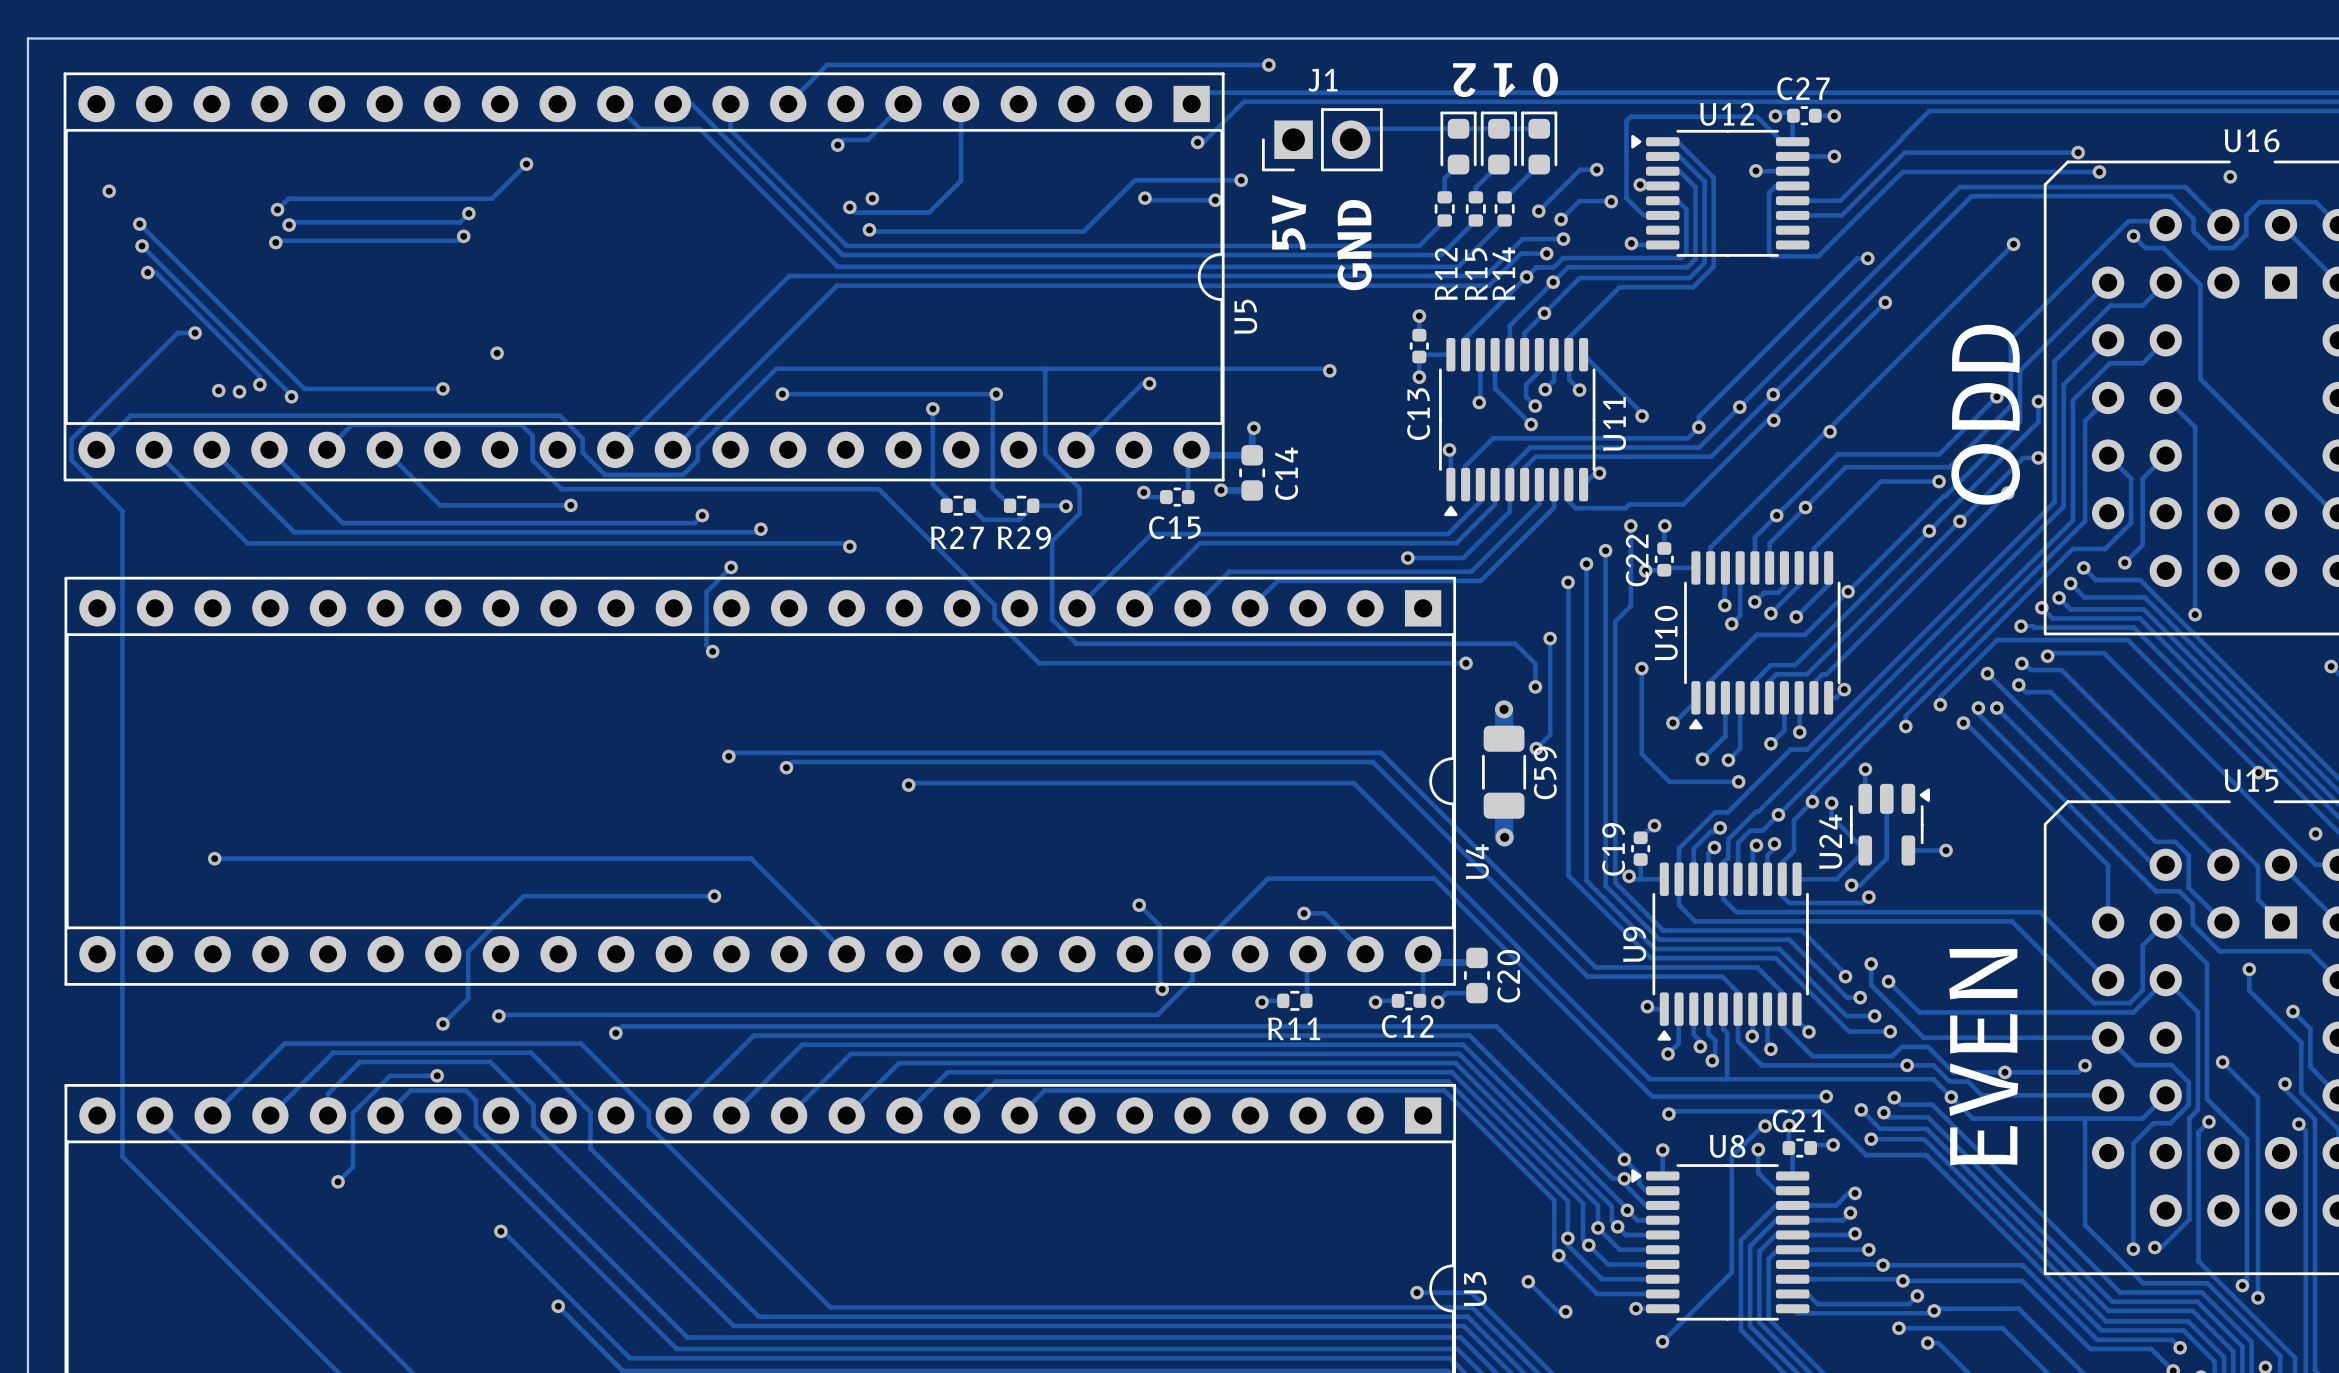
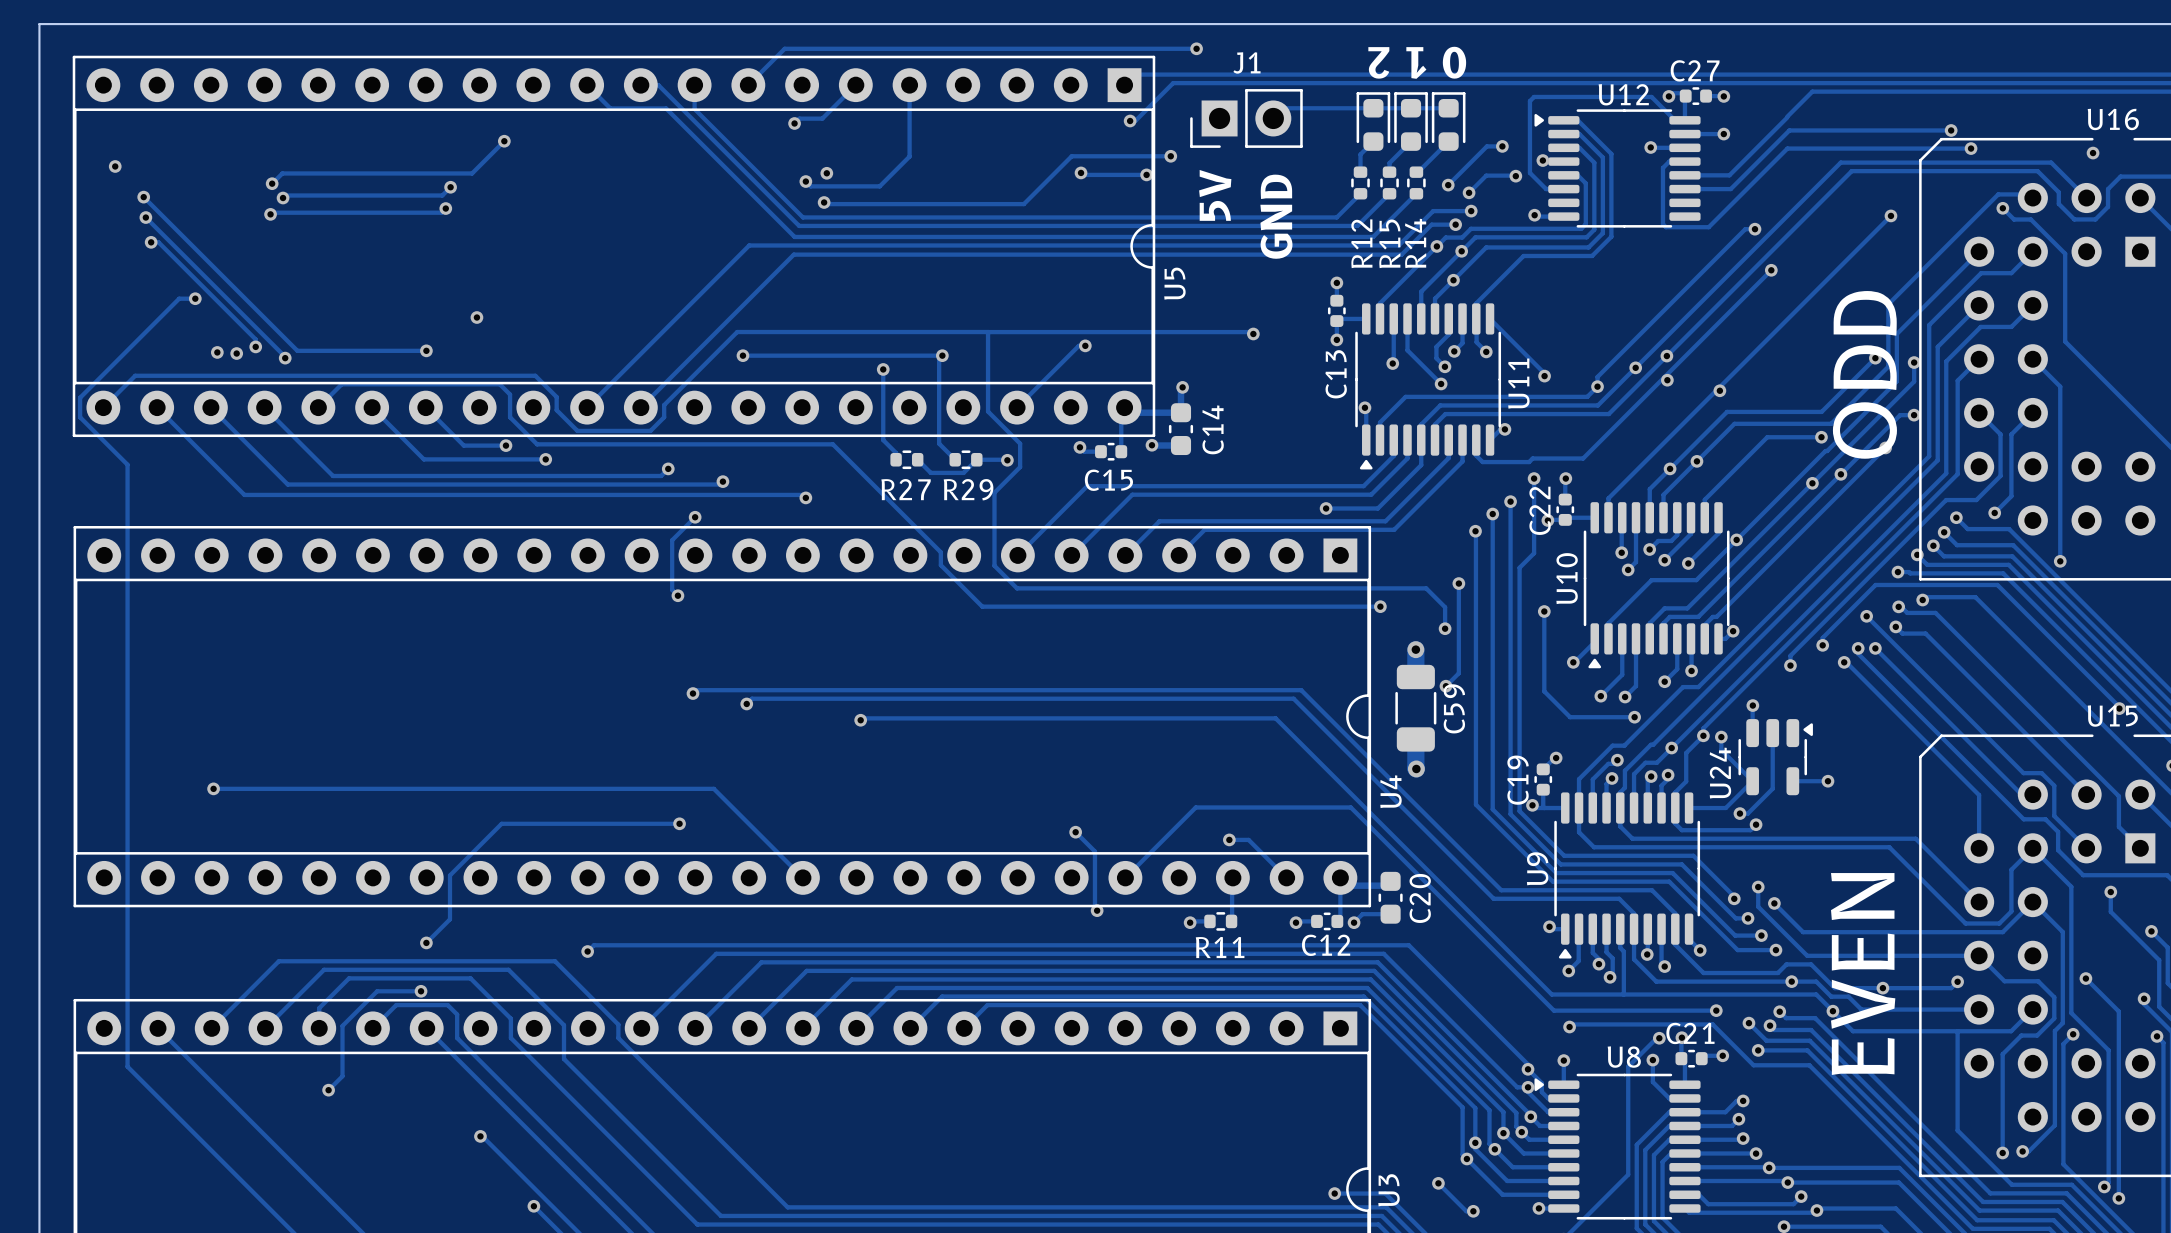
track: none -> (425, 407) (463, 445) (505, 445)
via: none -> (505, 445)
track: (1192, 954) (1192, 979) (1157, 1014) (498, 1016) -> none
via: (498, 1016) -> none

